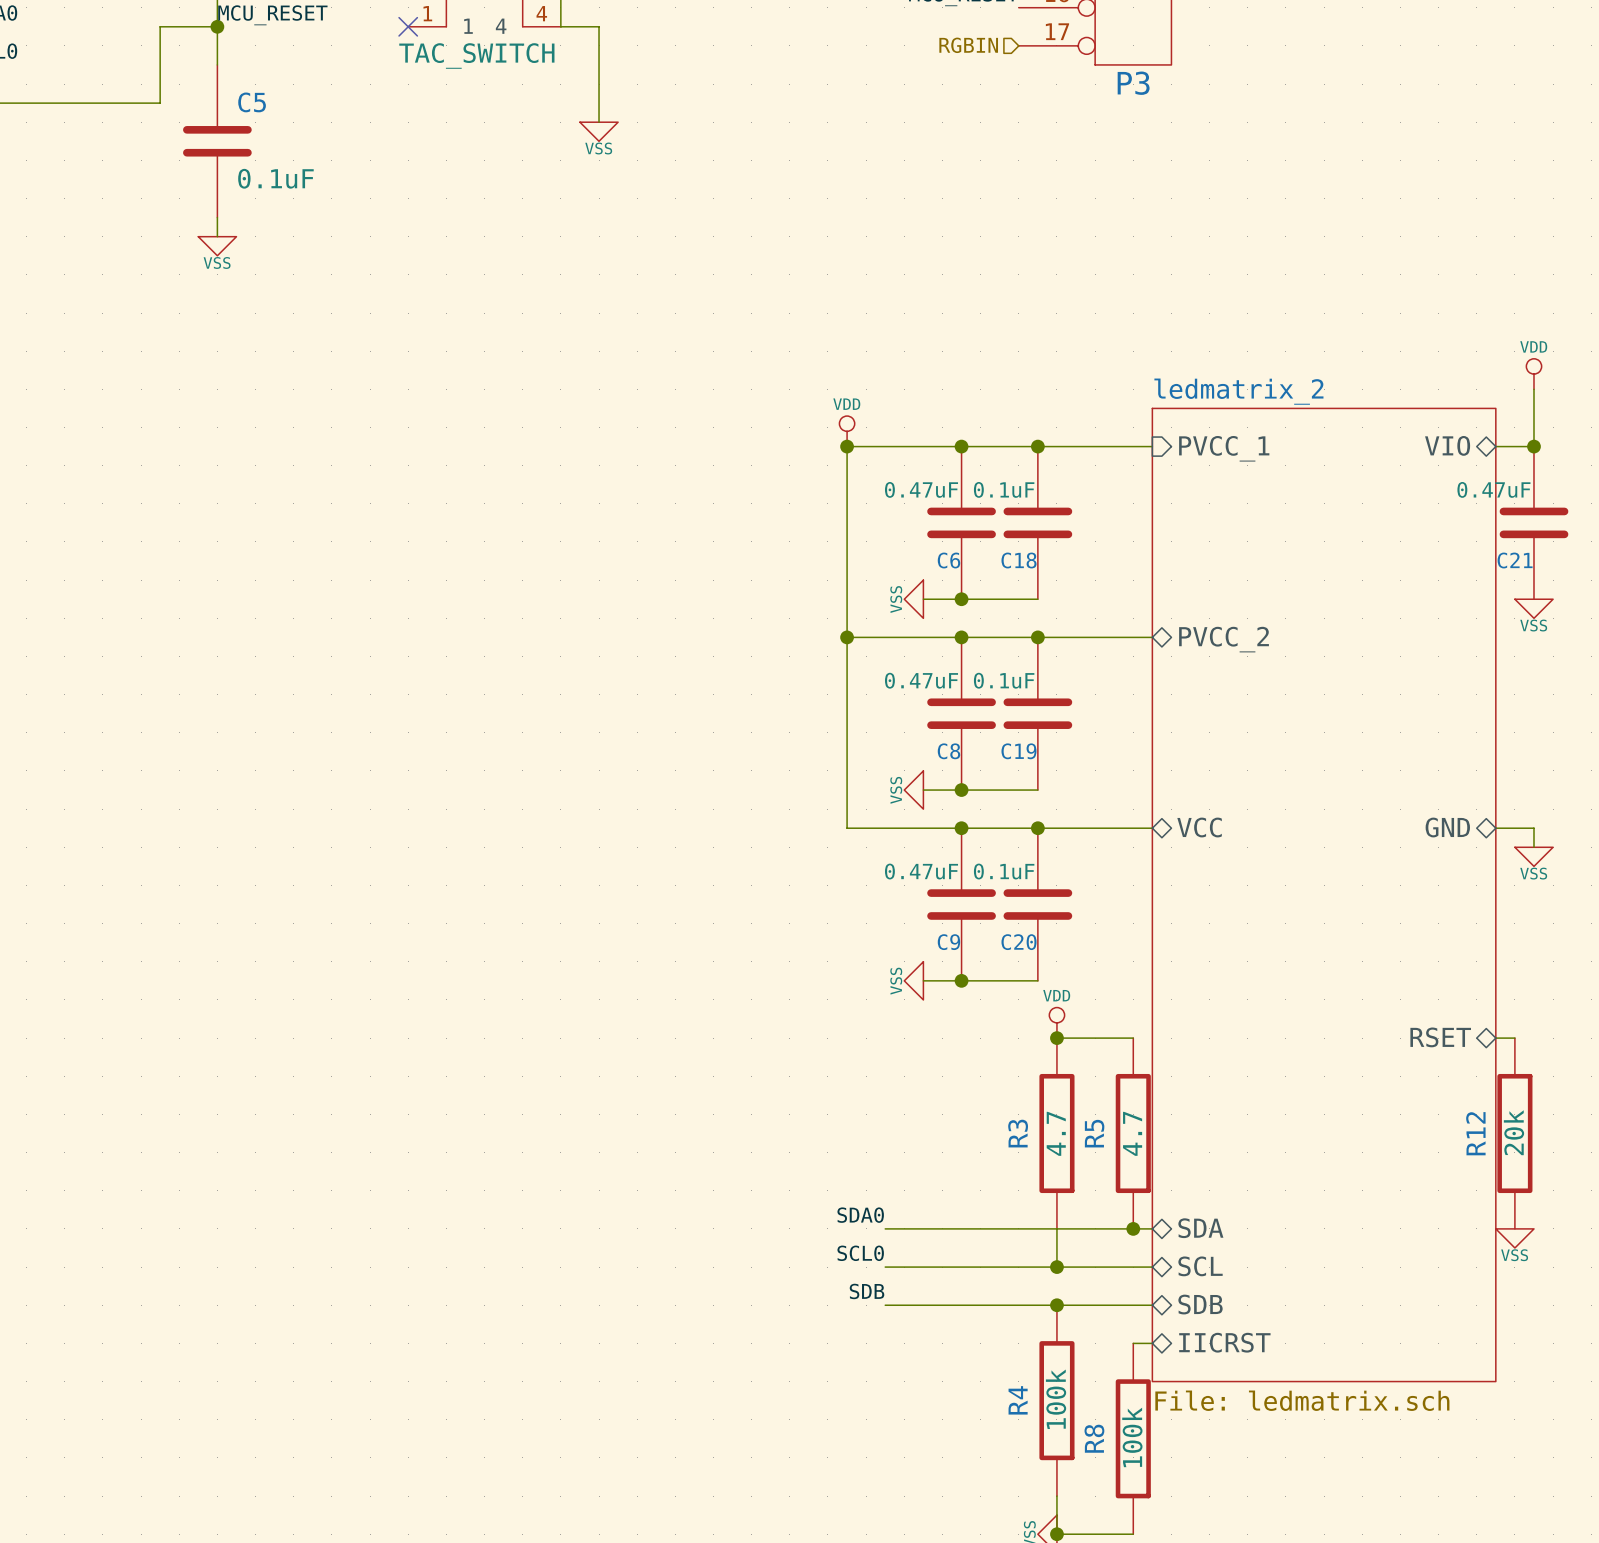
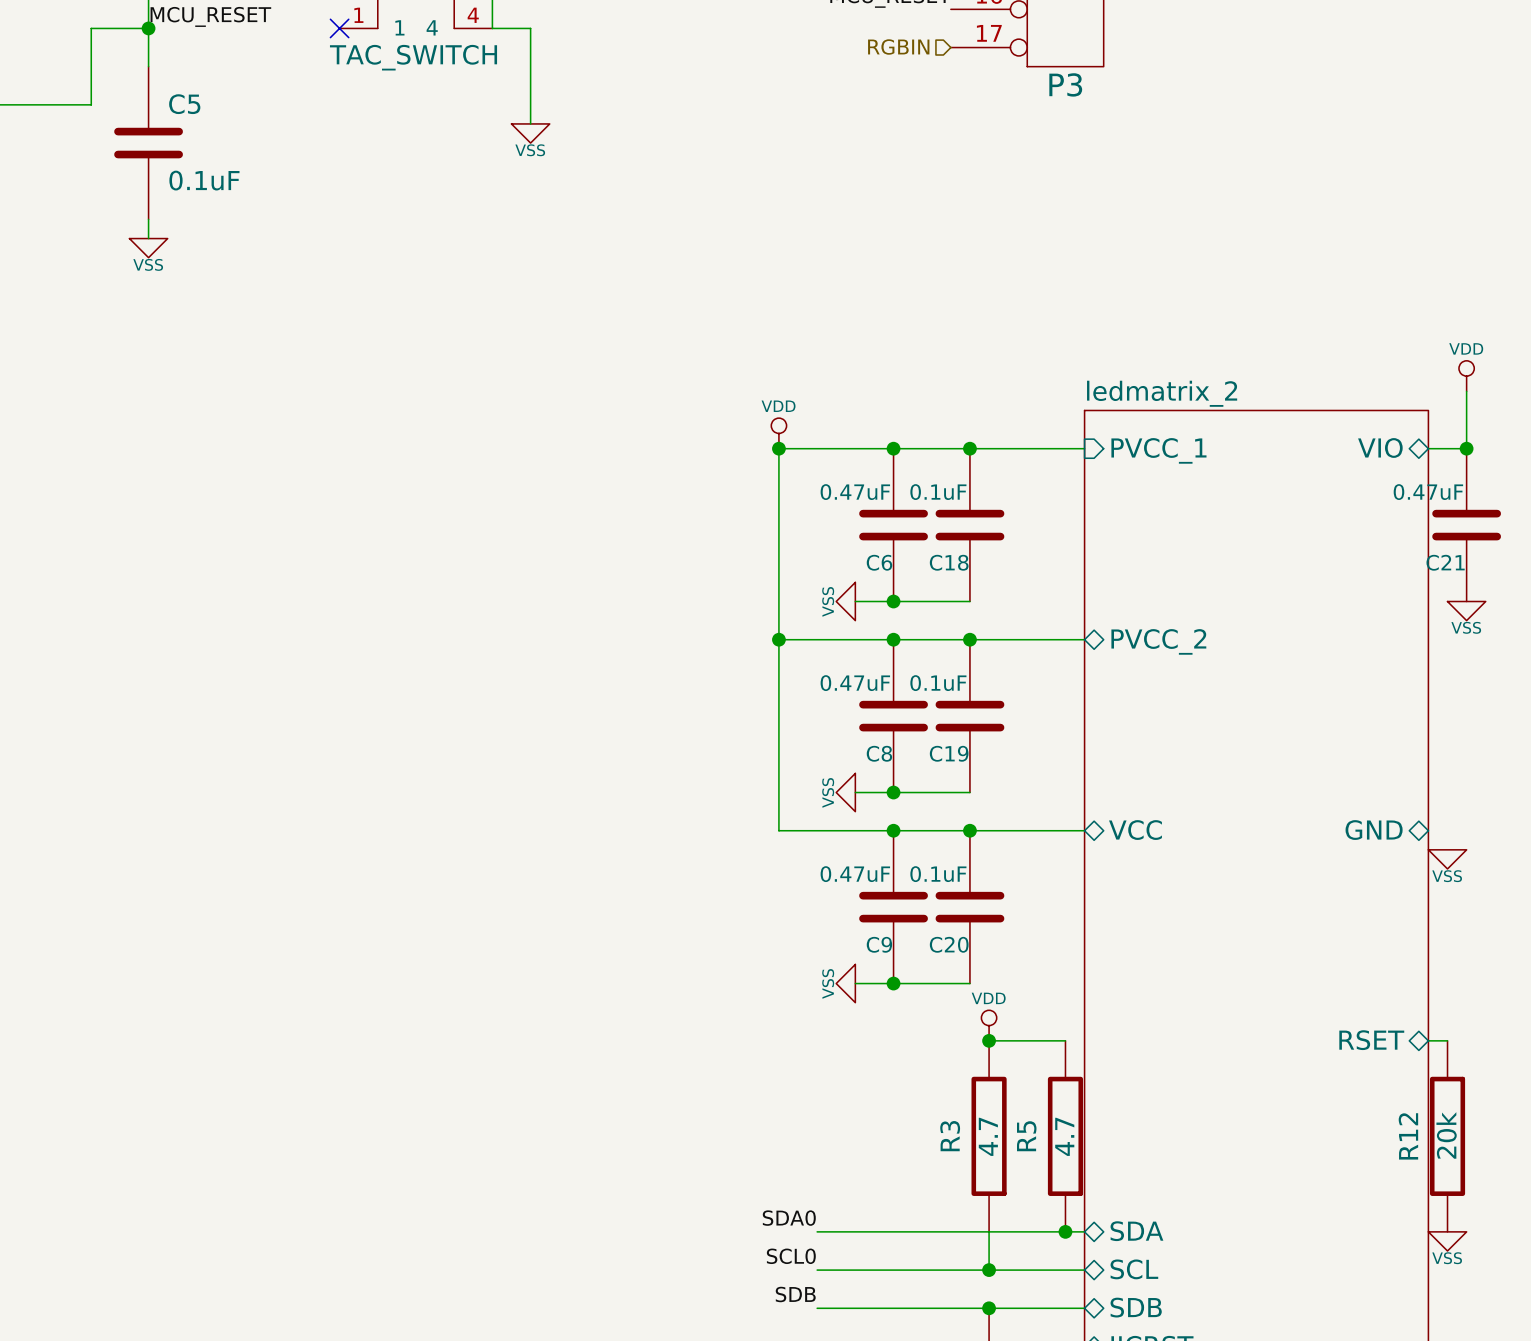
wire: (1495, 828) (1533, 828) (1533, 847) -> none
power symbol position: VSS (1533, 856) -> VSS (1447, 859)

